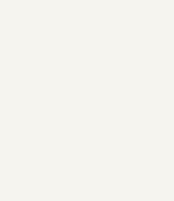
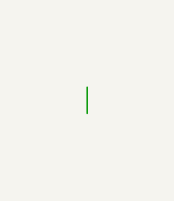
wire: none -> (87, 87) (87, 113)

